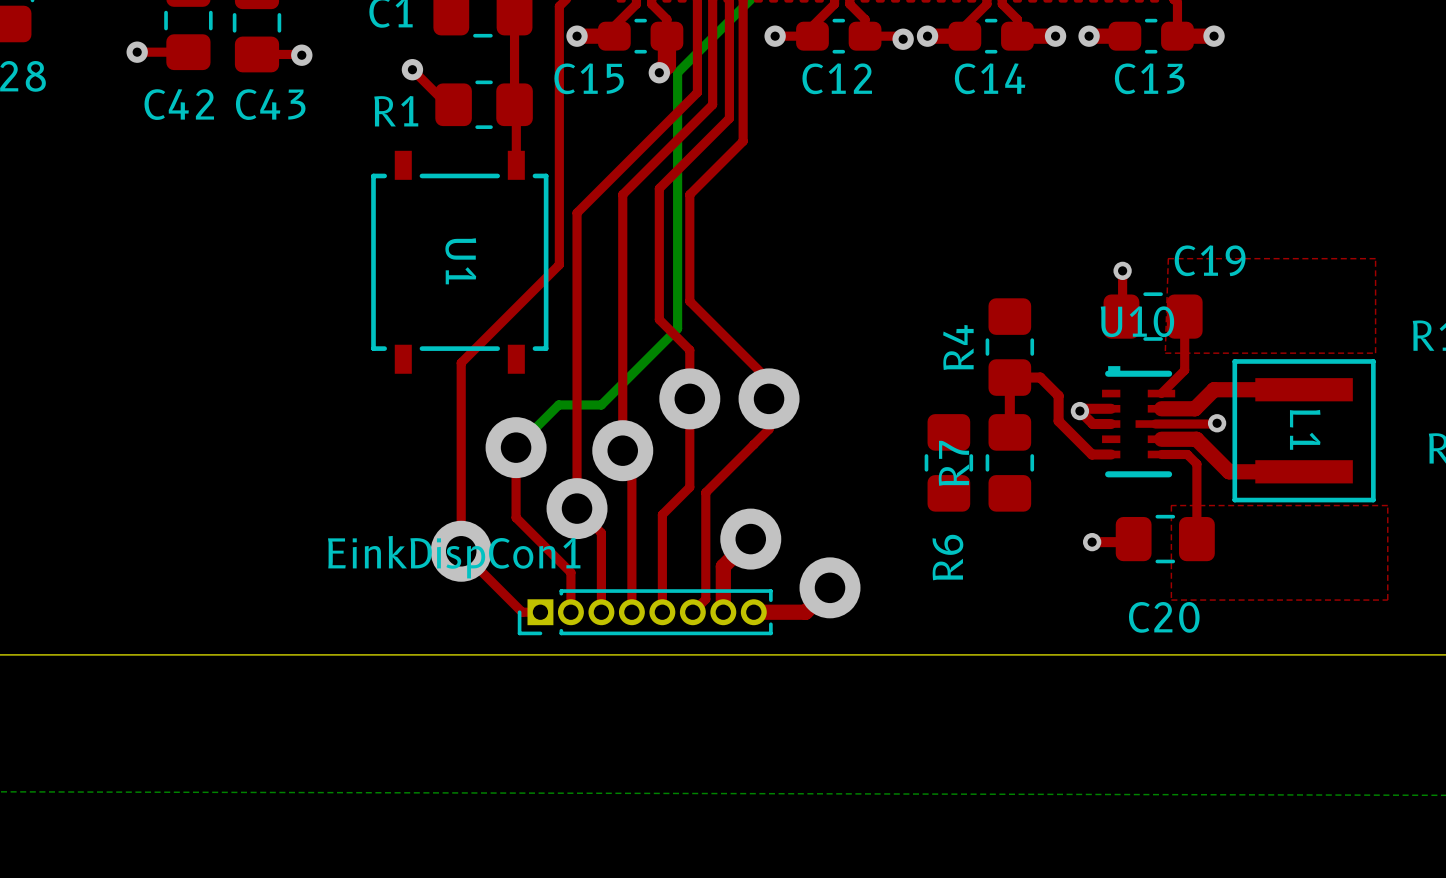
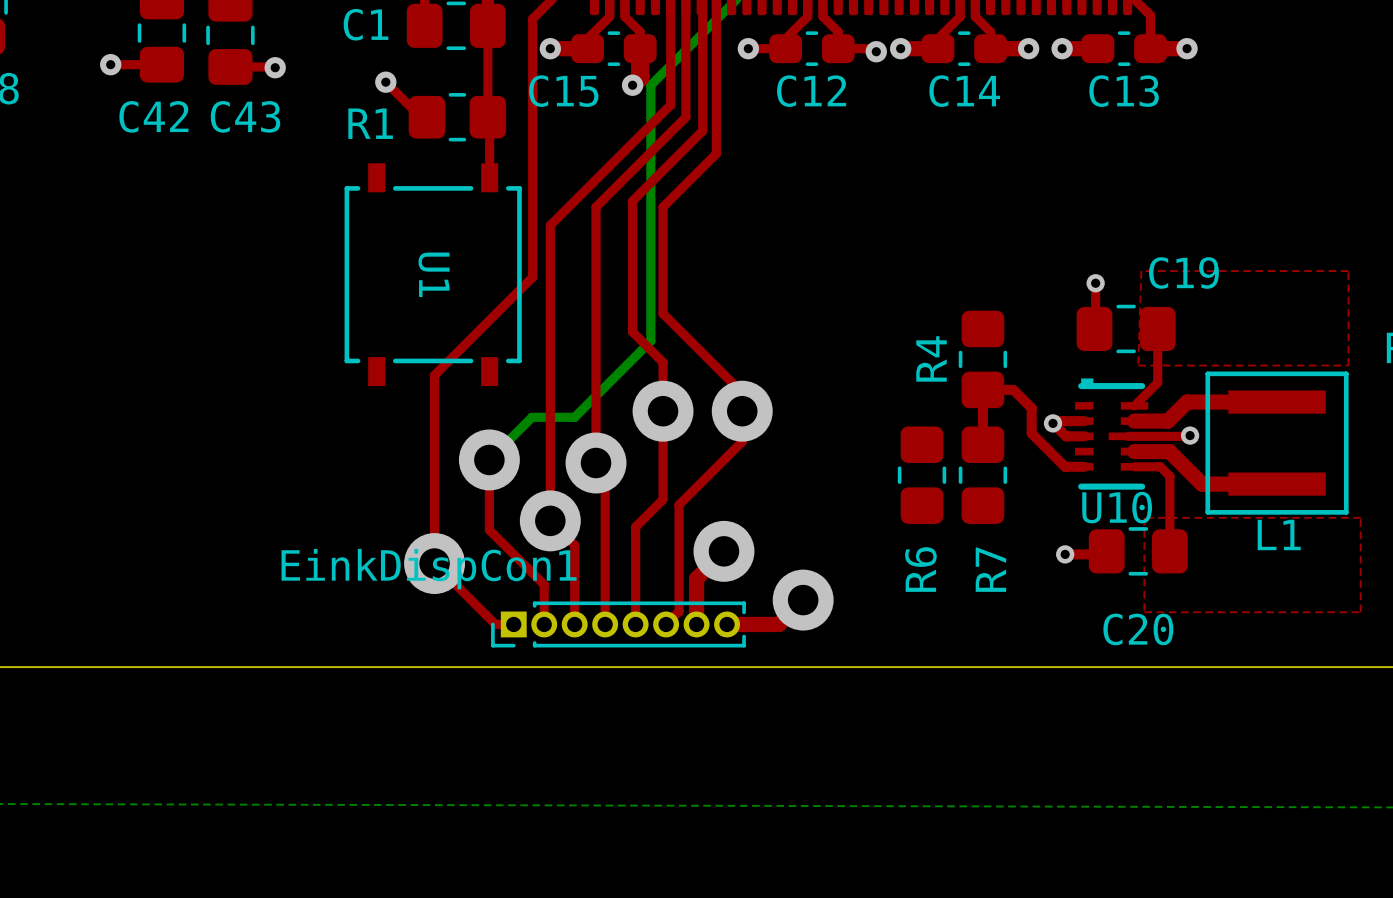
U10 name position: U10 (1137, 321) -> U10 (1117, 507)
L1 name rotation: 0° (1305, 429) -> 90° counterclockwise (1279, 534)
L1 name position: L1 (1305, 429) -> L1 (1279, 534)
R7 name position: R7 (953, 463) -> R7 (990, 569)

